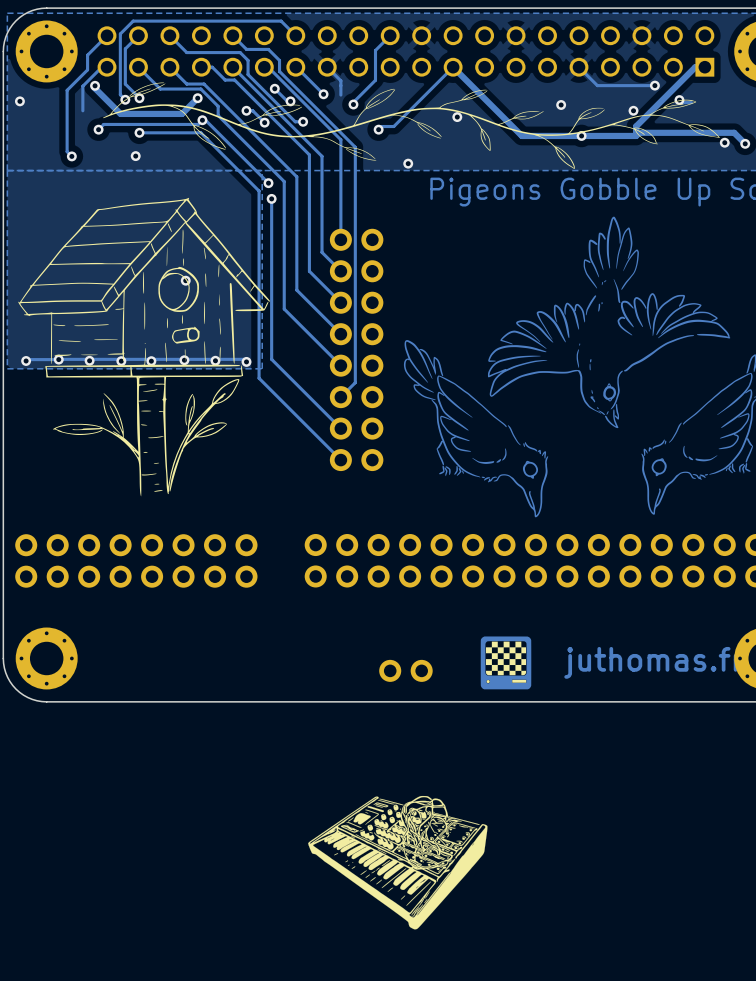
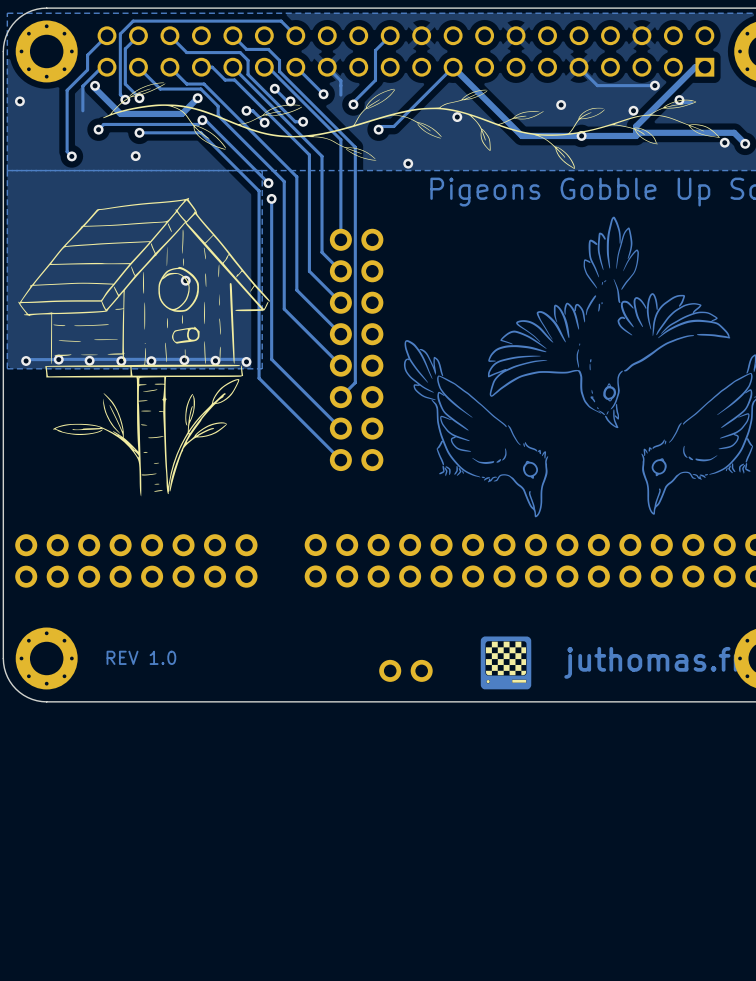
text: none -> REV 1.0 (141, 657)
drawing: [308, 795, 488, 930] -> none

